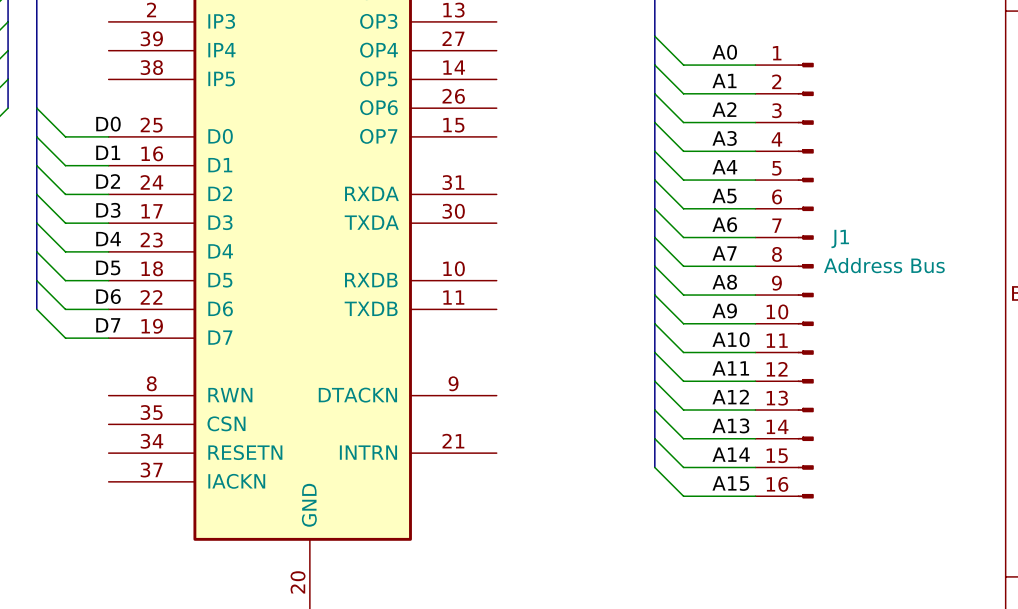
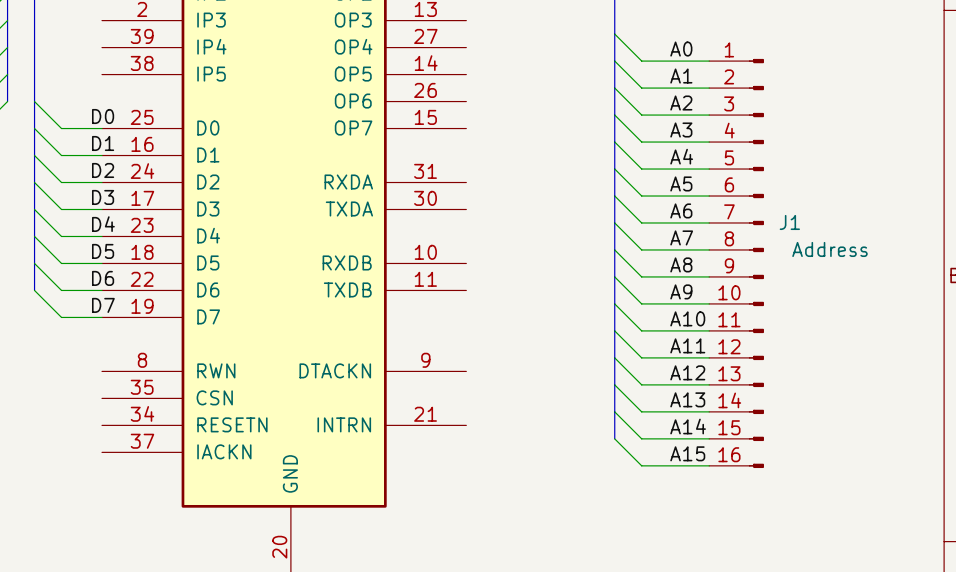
J1 value: Address Bus (884, 265) -> Address (829, 249)

